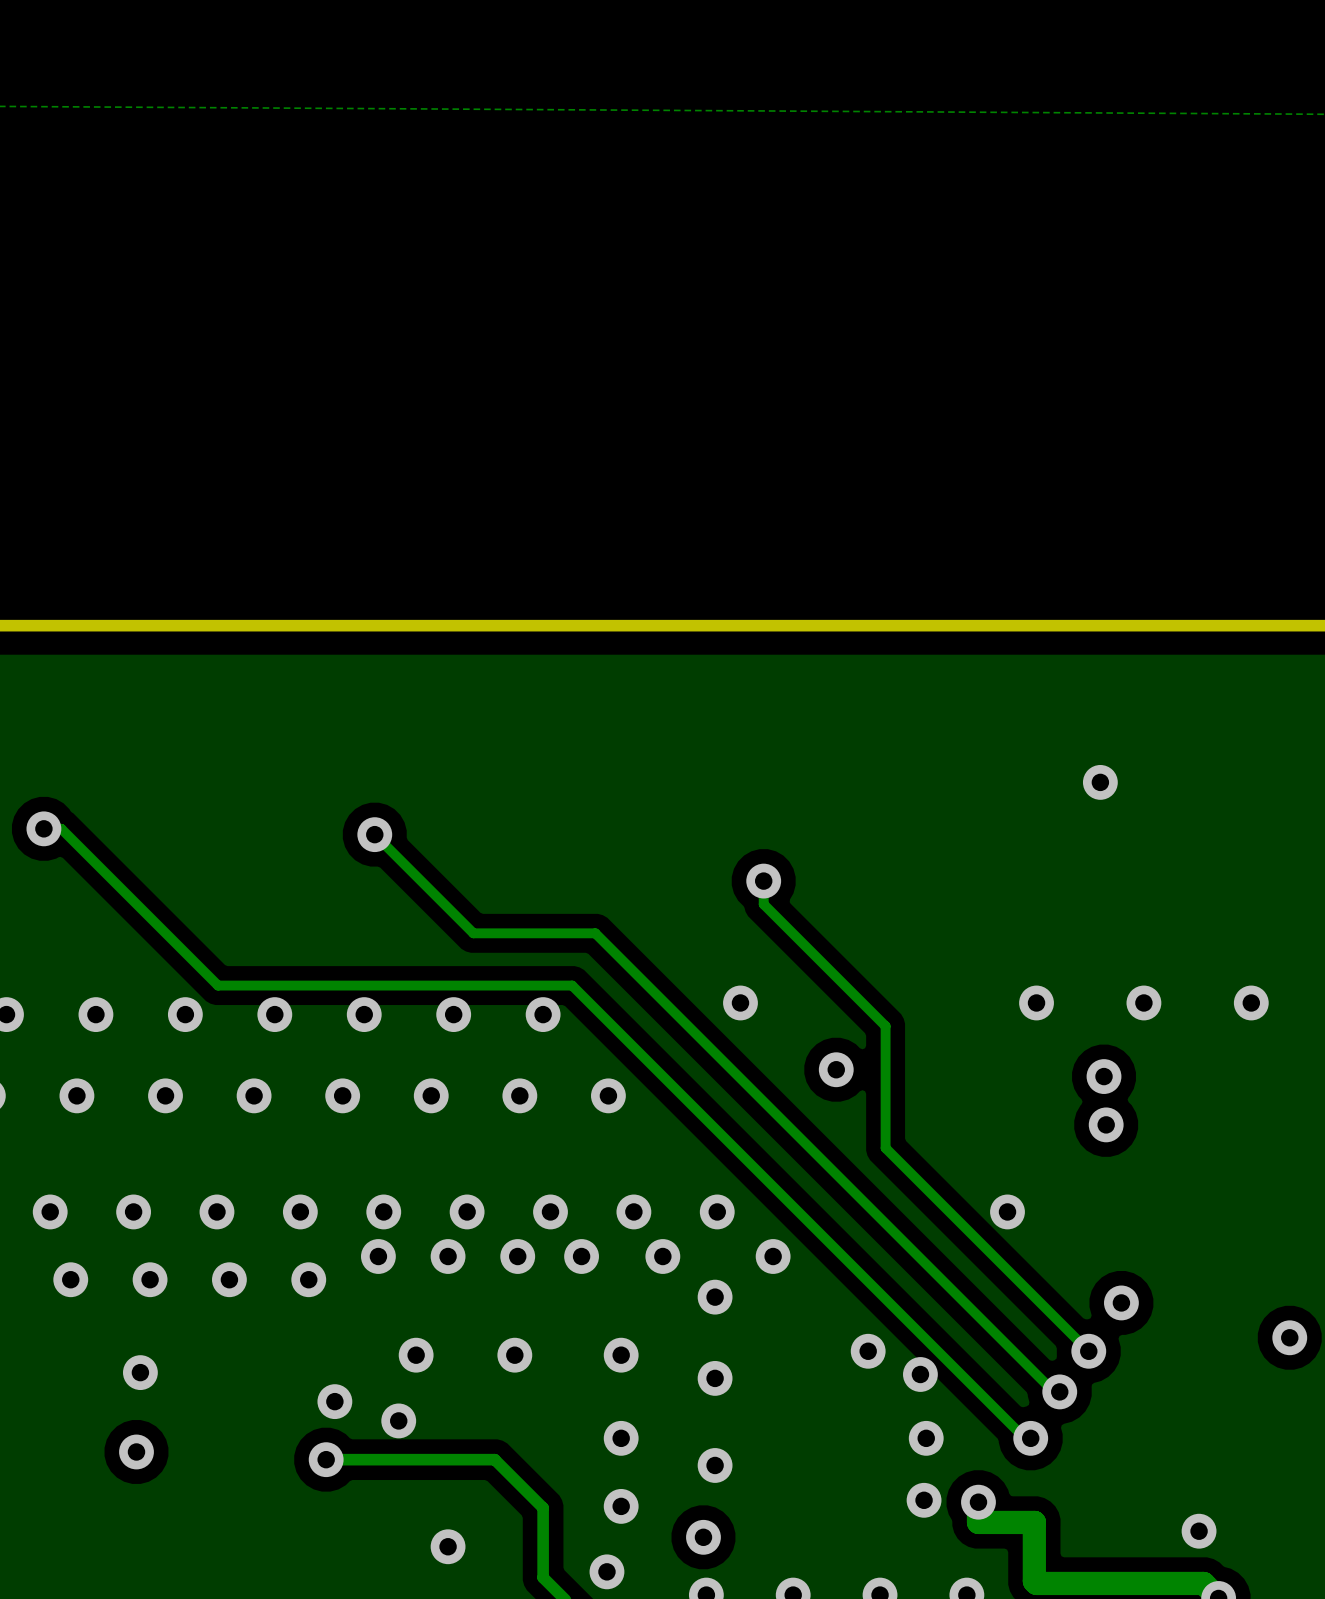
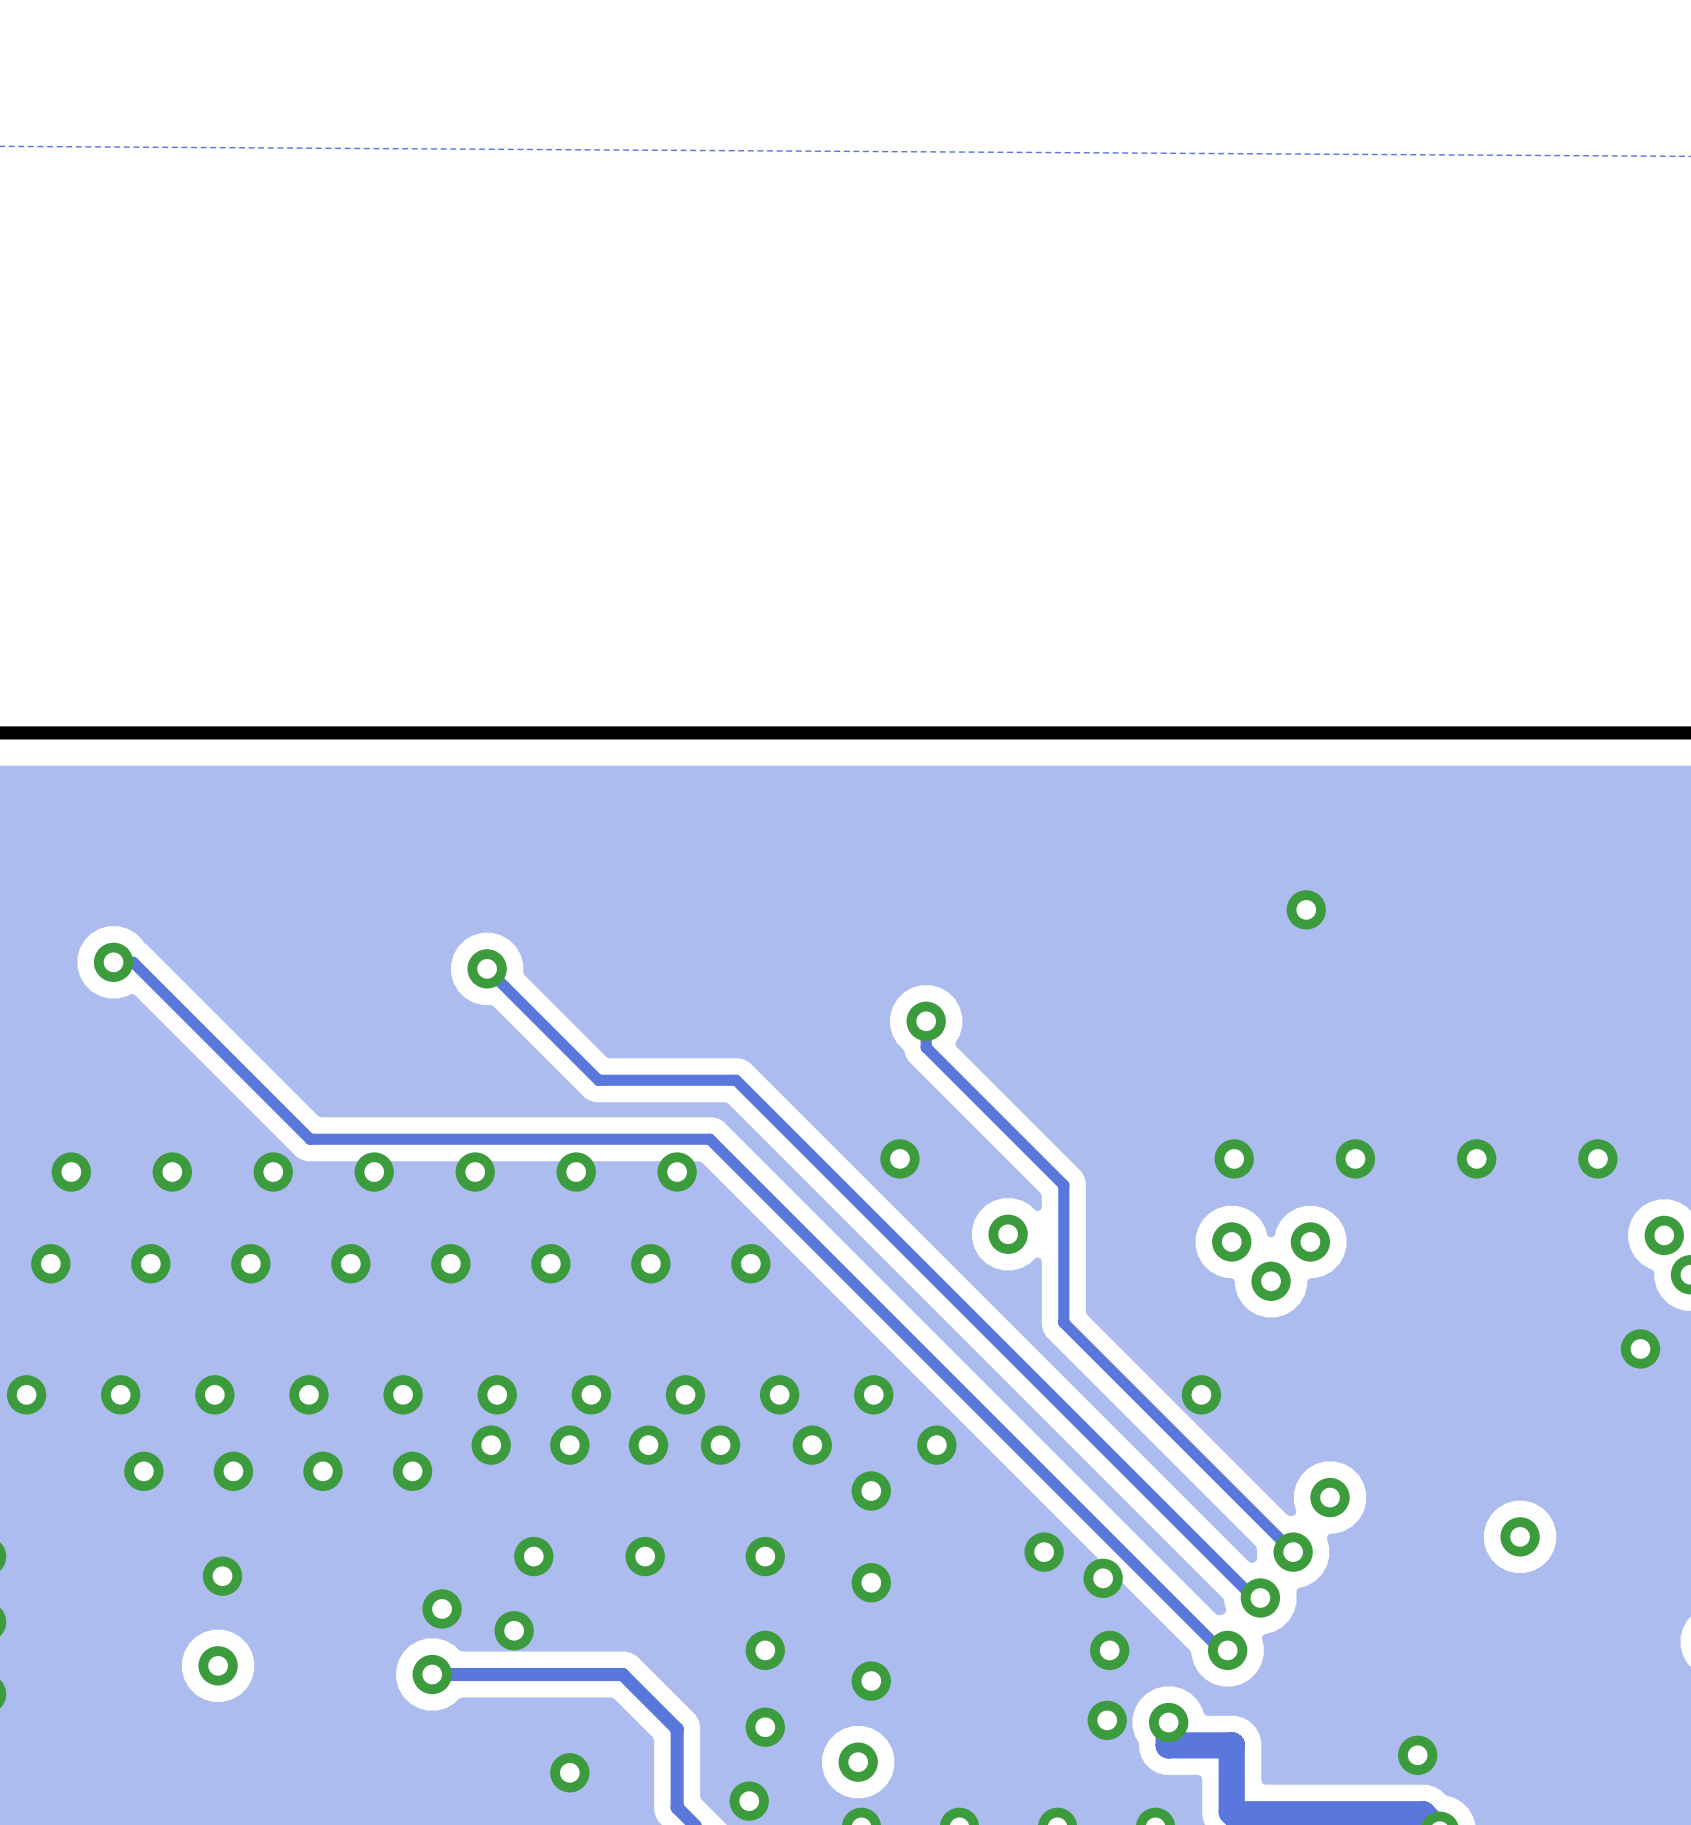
via: none -> (1231, 1241)
via position: (1106, 1124) -> (1271, 1281)

